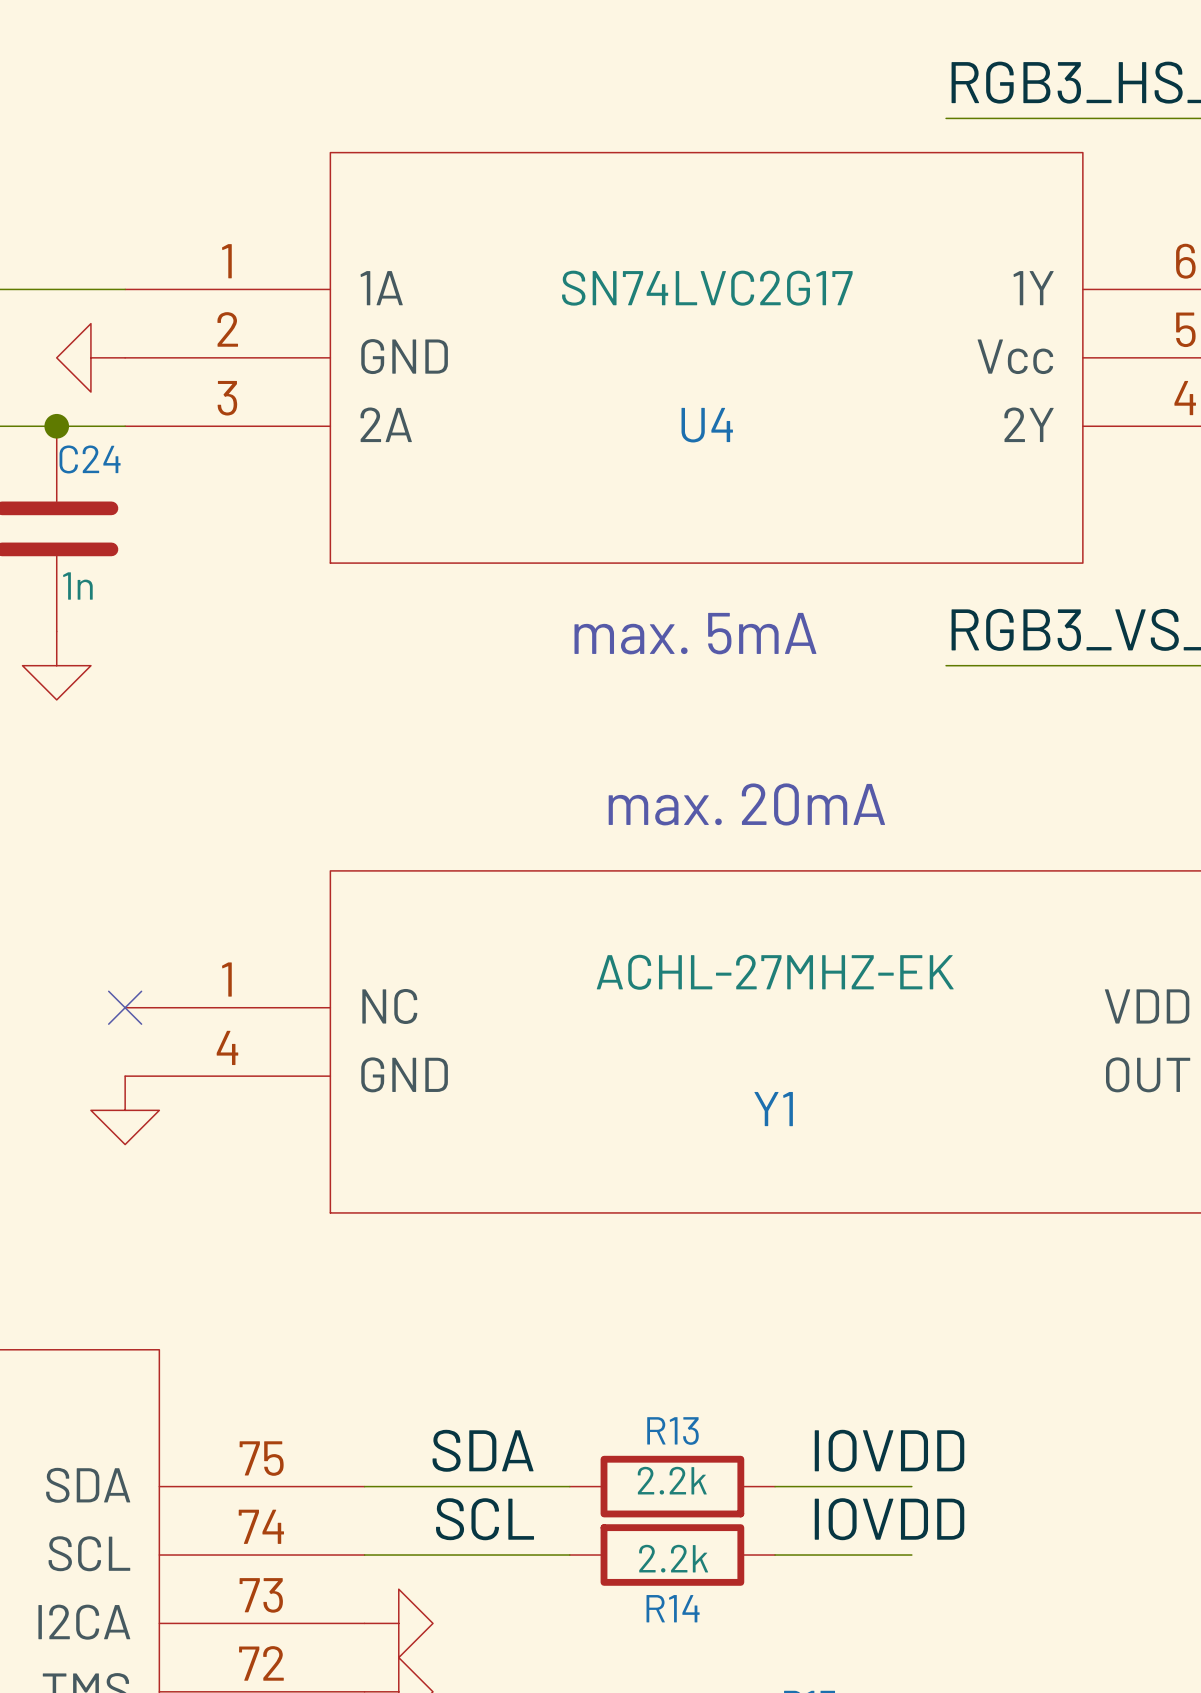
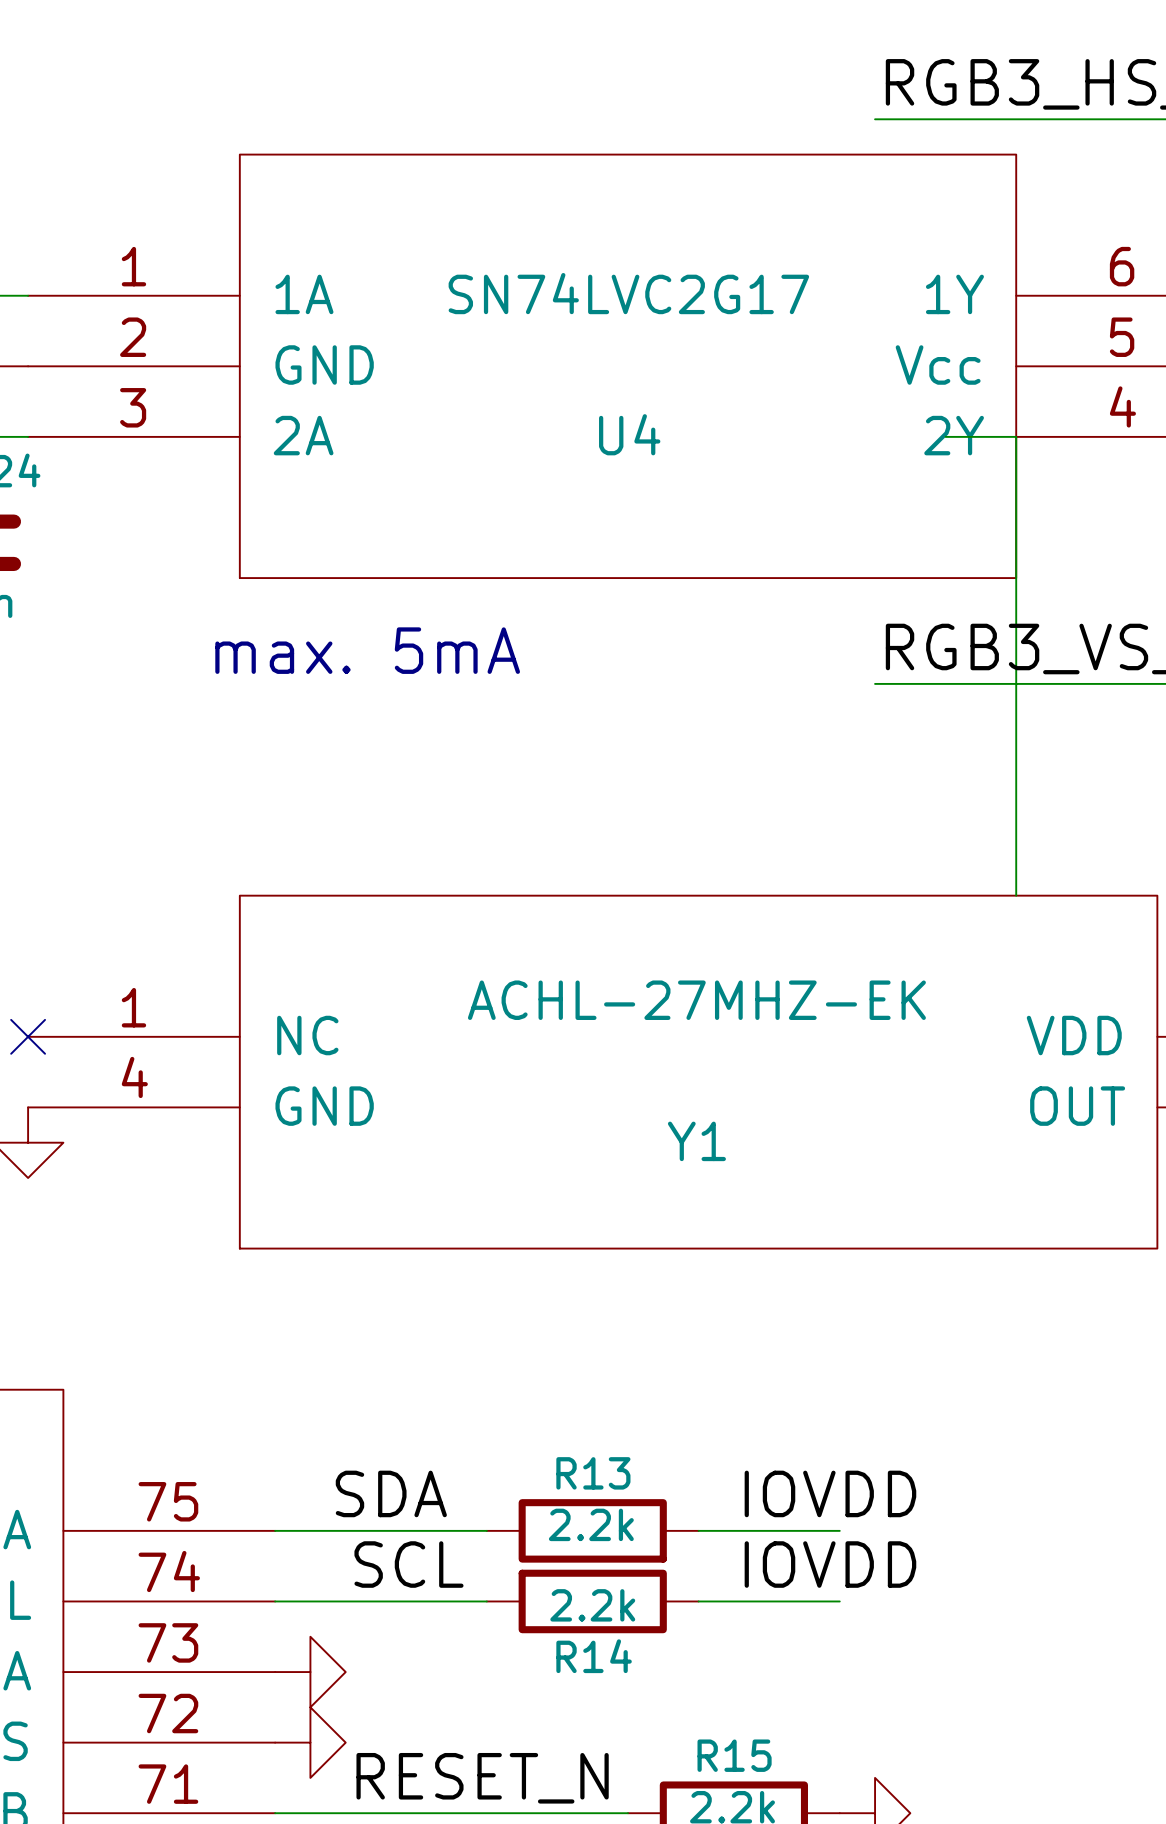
wire: none -> (945, 436) (1016, 436) (1016, 895)
text position: max. 5mA (695, 633) -> max. 5mA (367, 650)
text: max. 20mA (746, 804) -> none

